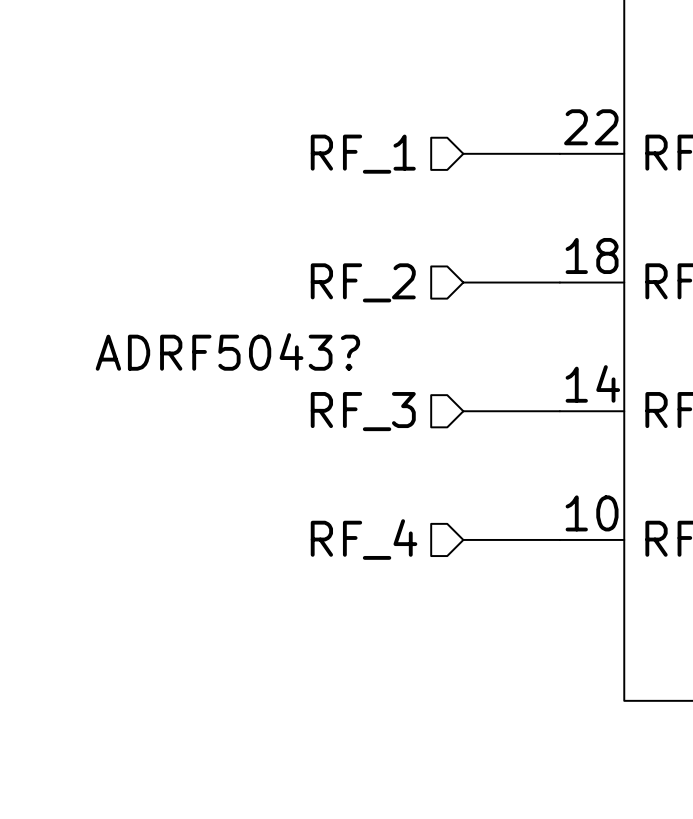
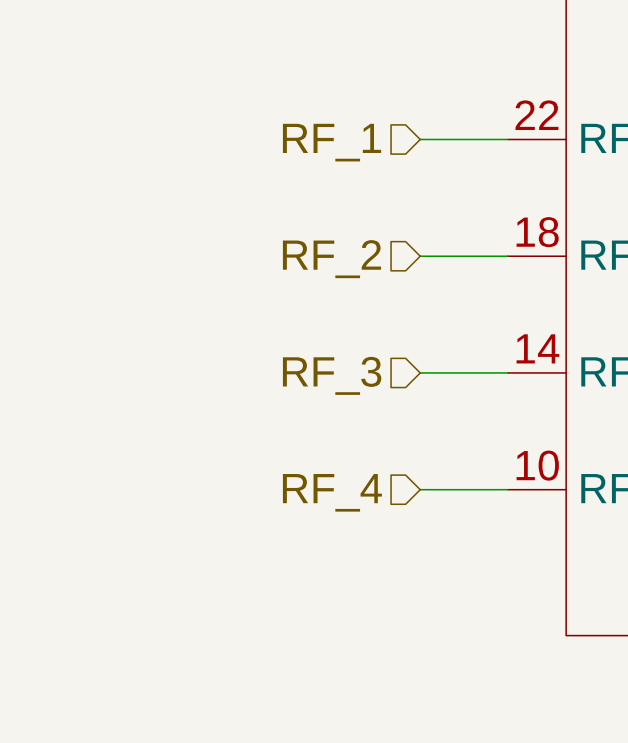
text: ADRF5043? (227, 351) -> none

